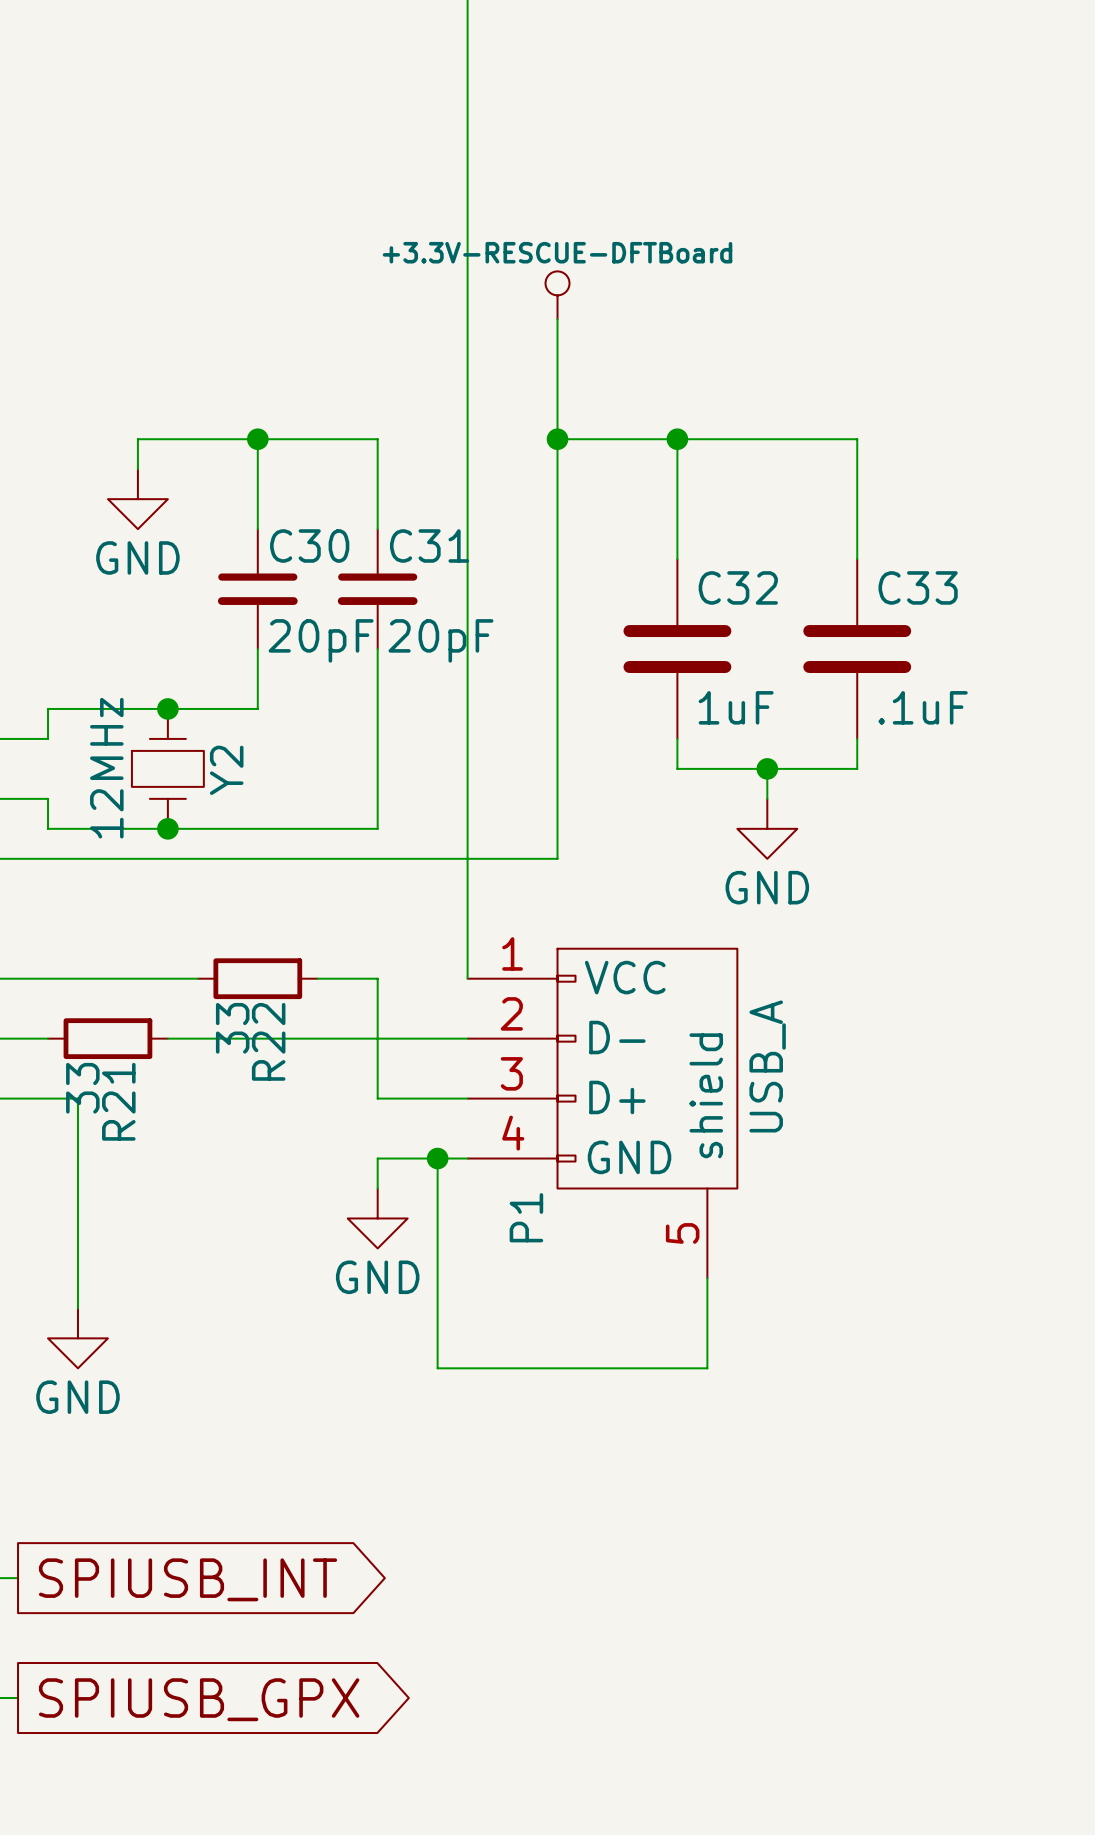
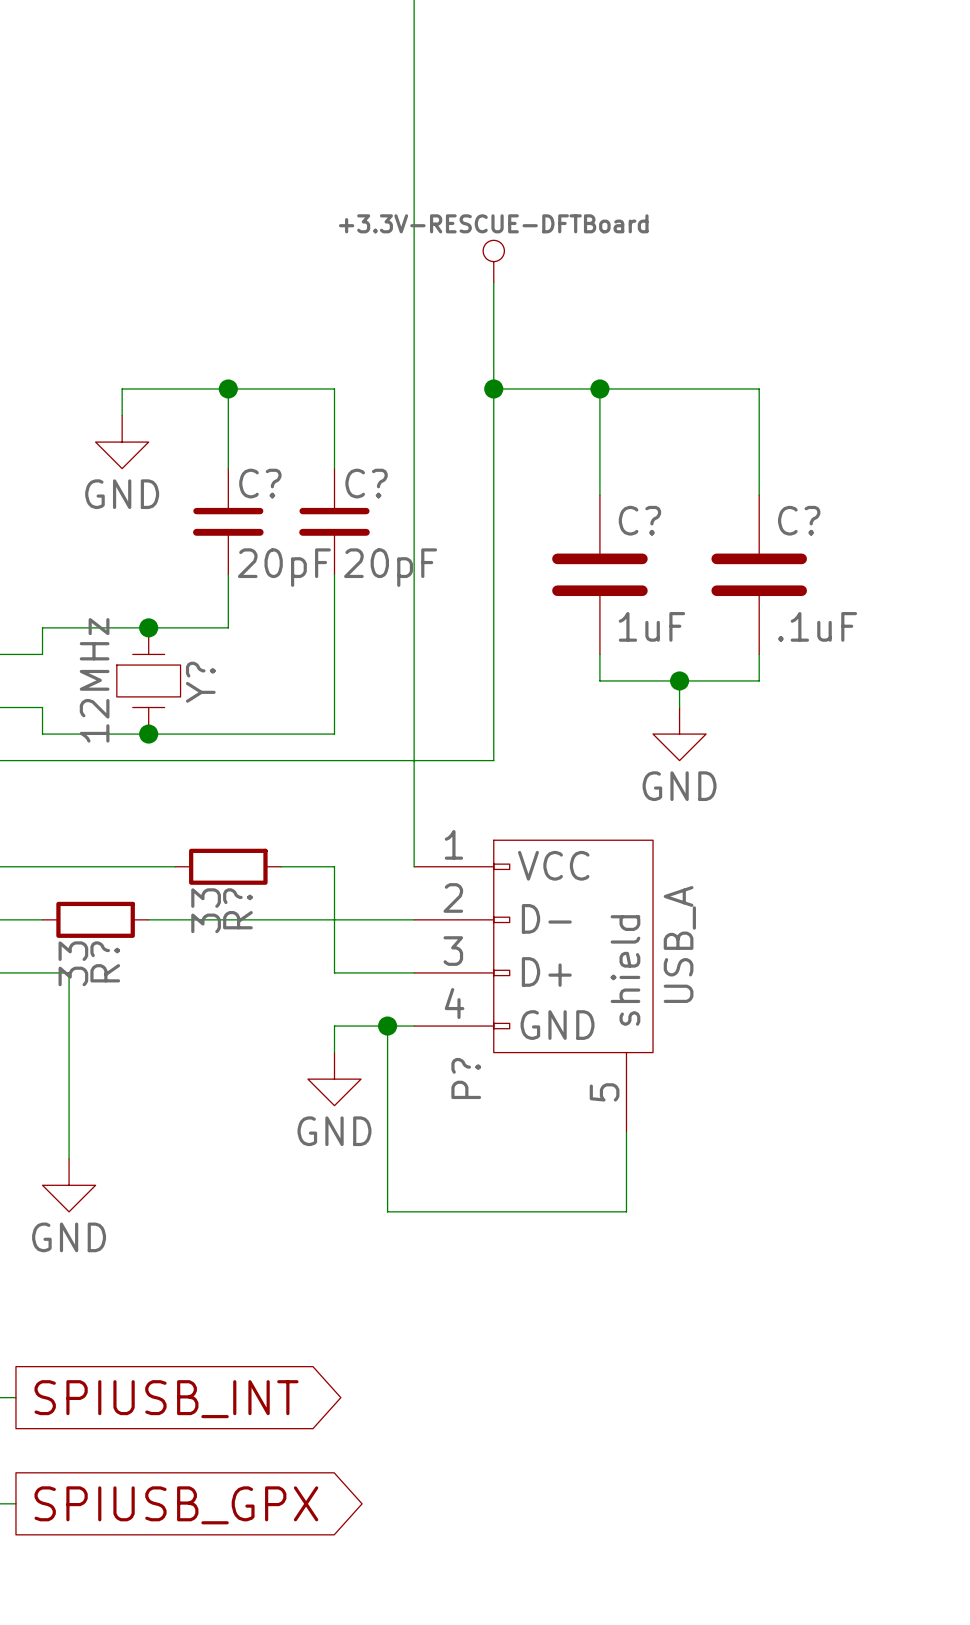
C30 name: C30 (309, 545) -> C? (260, 483)
C31 name: C31 (429, 545) -> C? (366, 483)
C32 name: C32 (738, 587) -> C? (639, 520)
C33 name: C33 (918, 587) -> C? (799, 520)
Y2 name: Y2 (226, 770) -> Y? (200, 682)
R22 name: R22 (268, 1041) -> R? (237, 908)
R21 name: R21 (118, 1101) -> R? (105, 961)
P1 name: P1 (526, 1217) -> P? (466, 1078)

